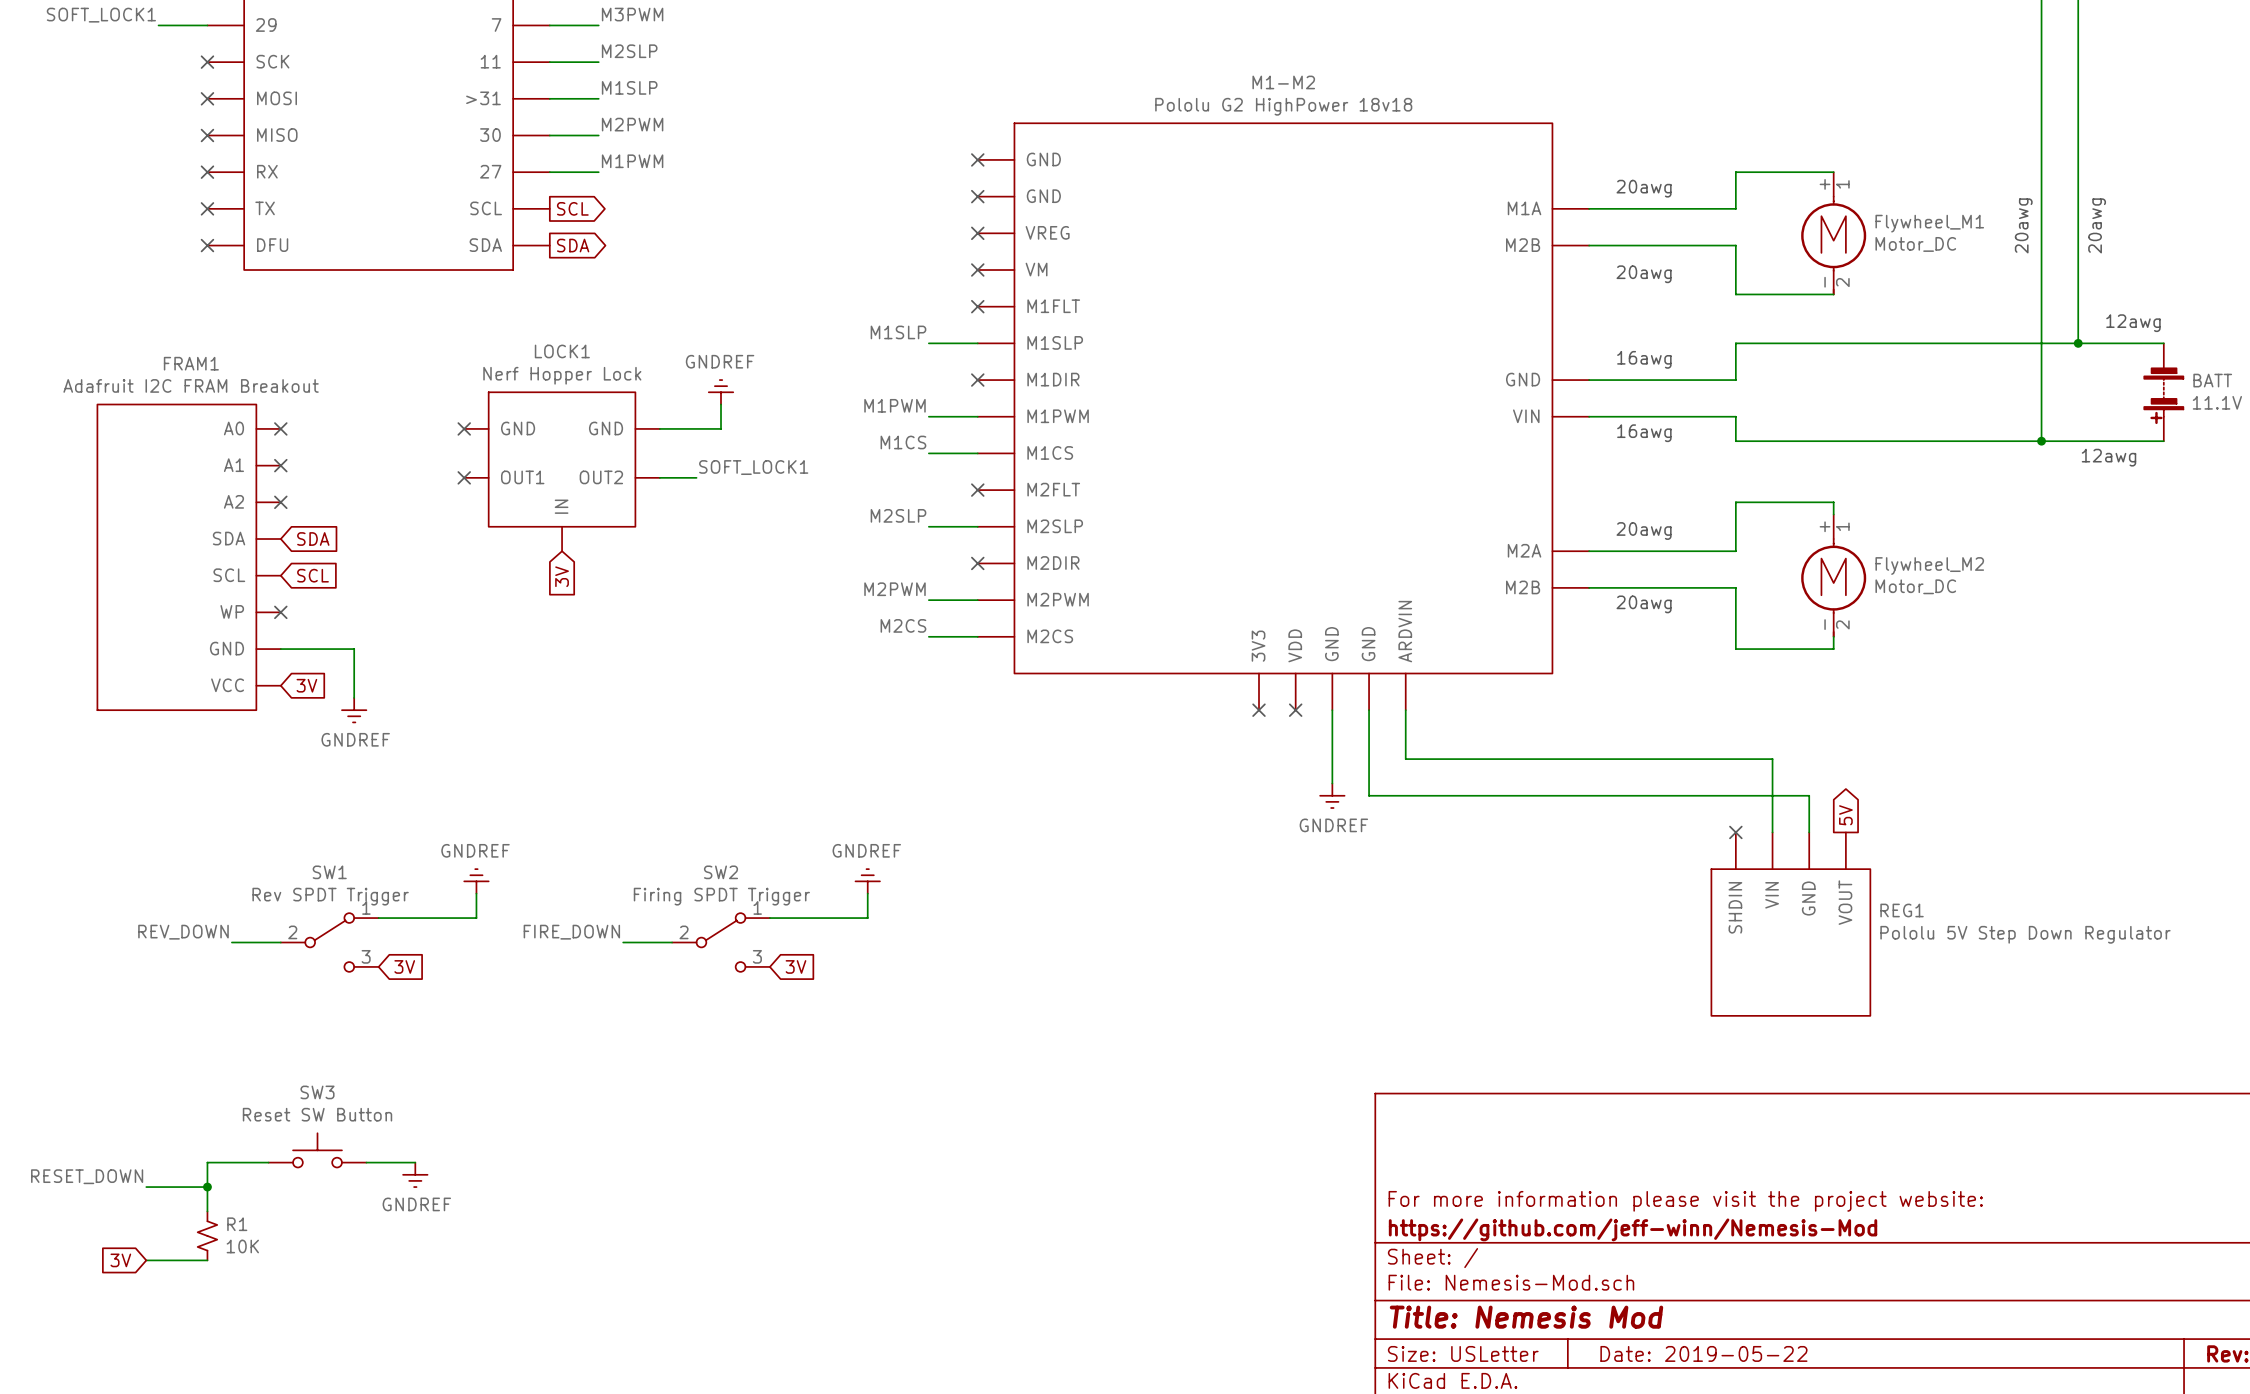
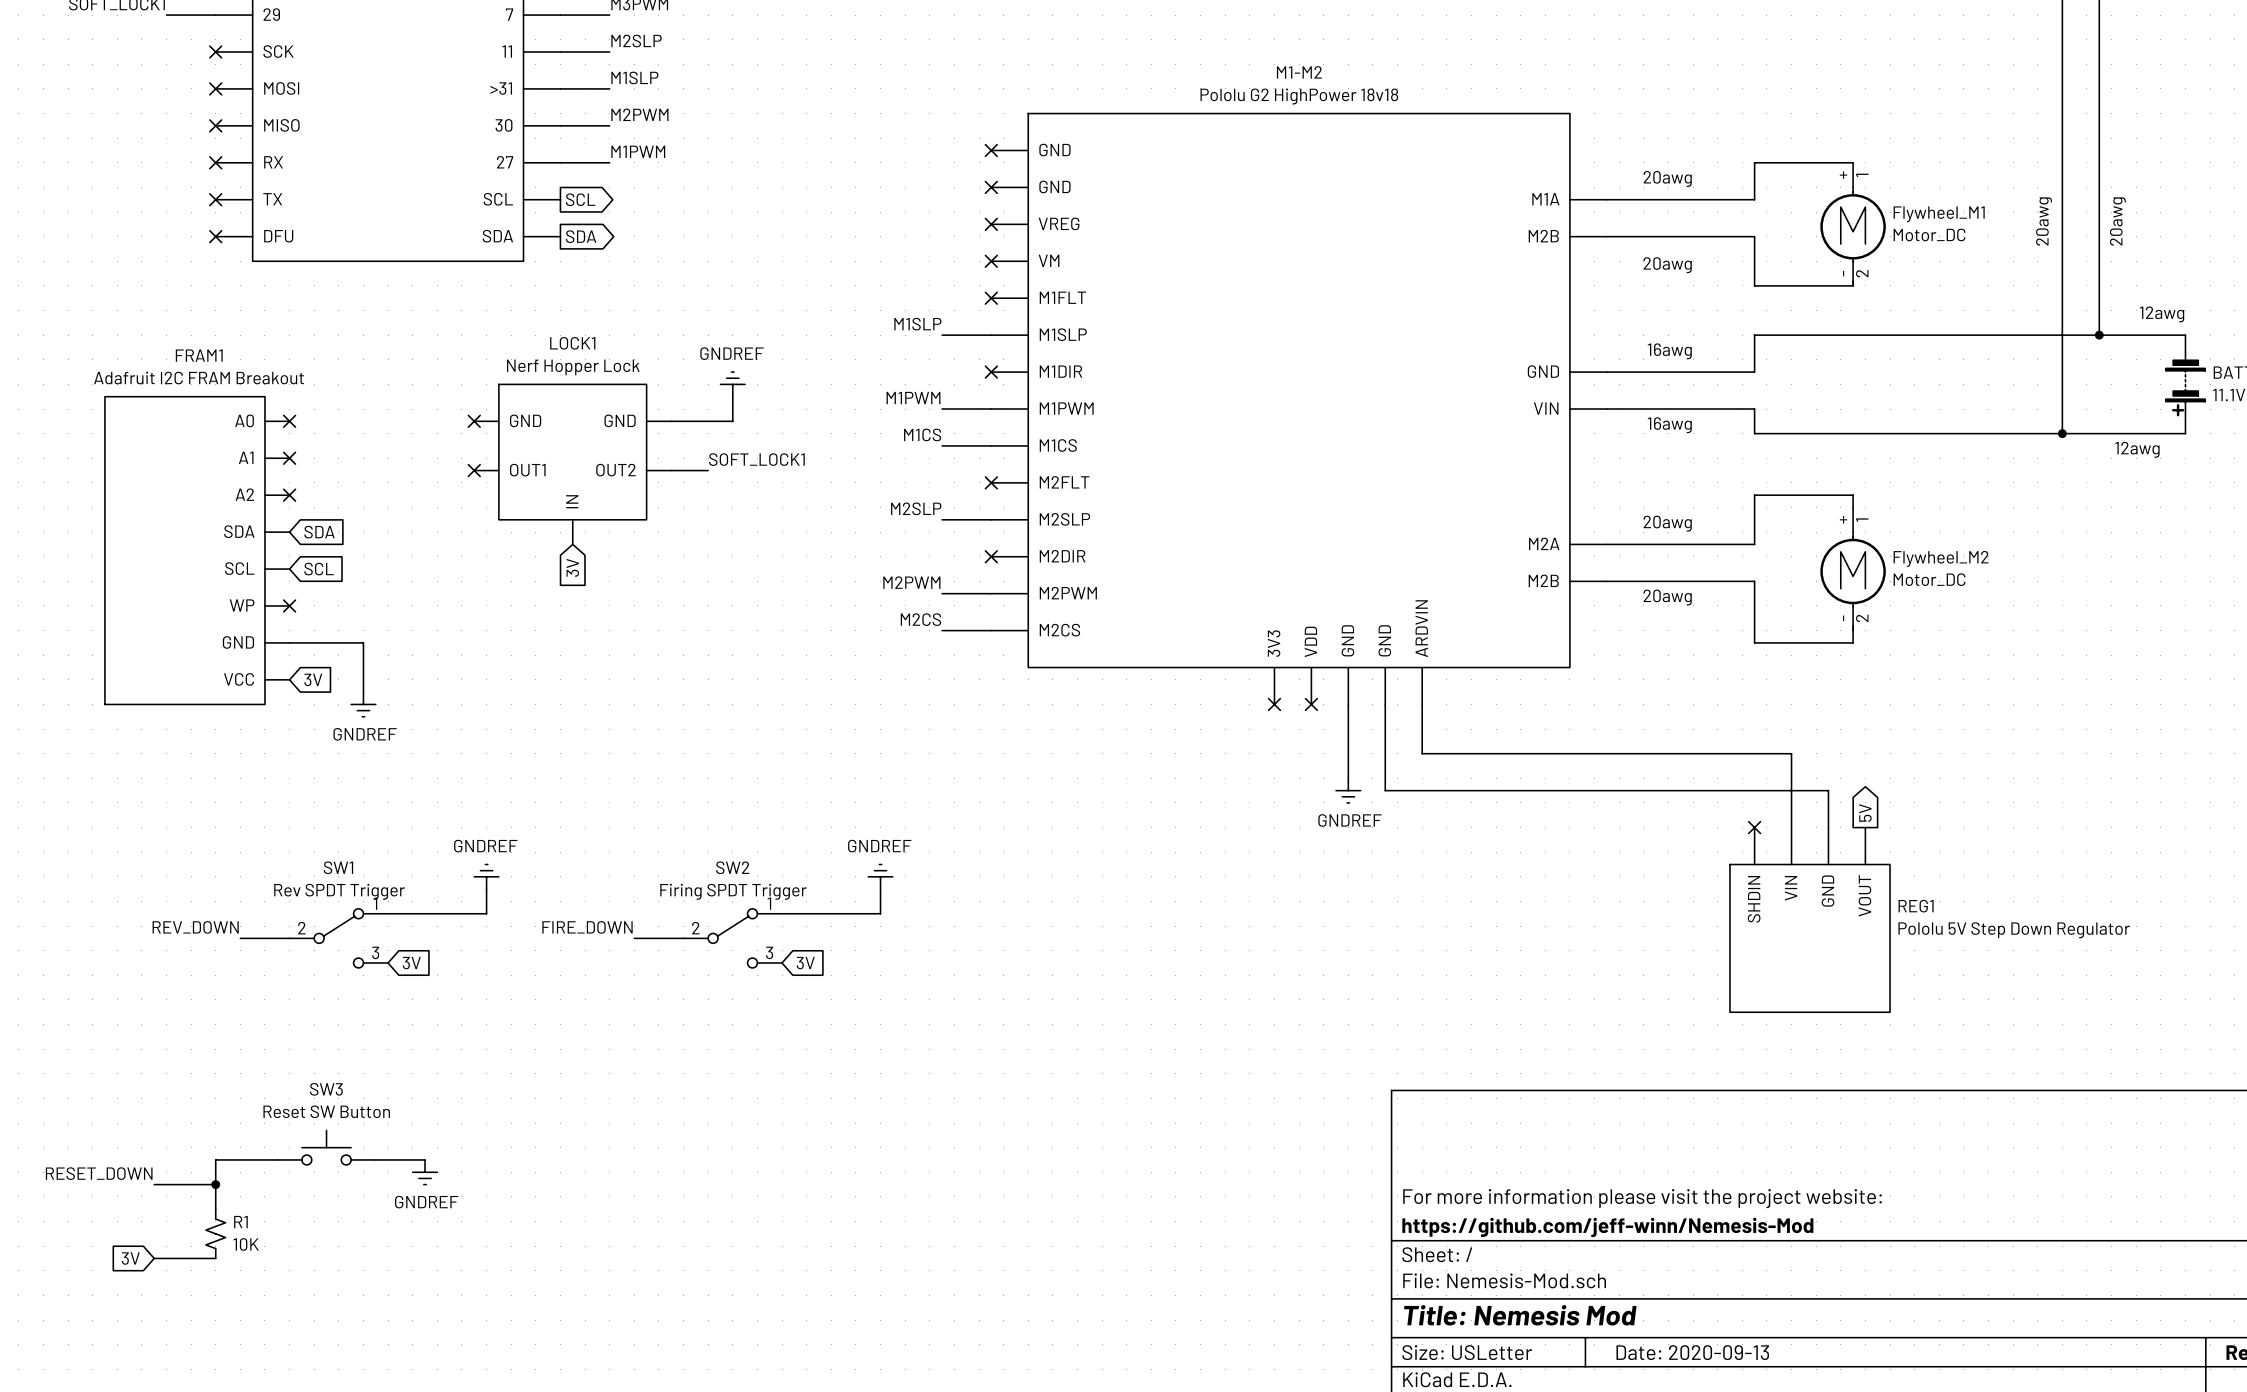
title block: Date: 2019-05-22 (1703, 1353) -> Date: 2020-09-13 (1692, 1352)

